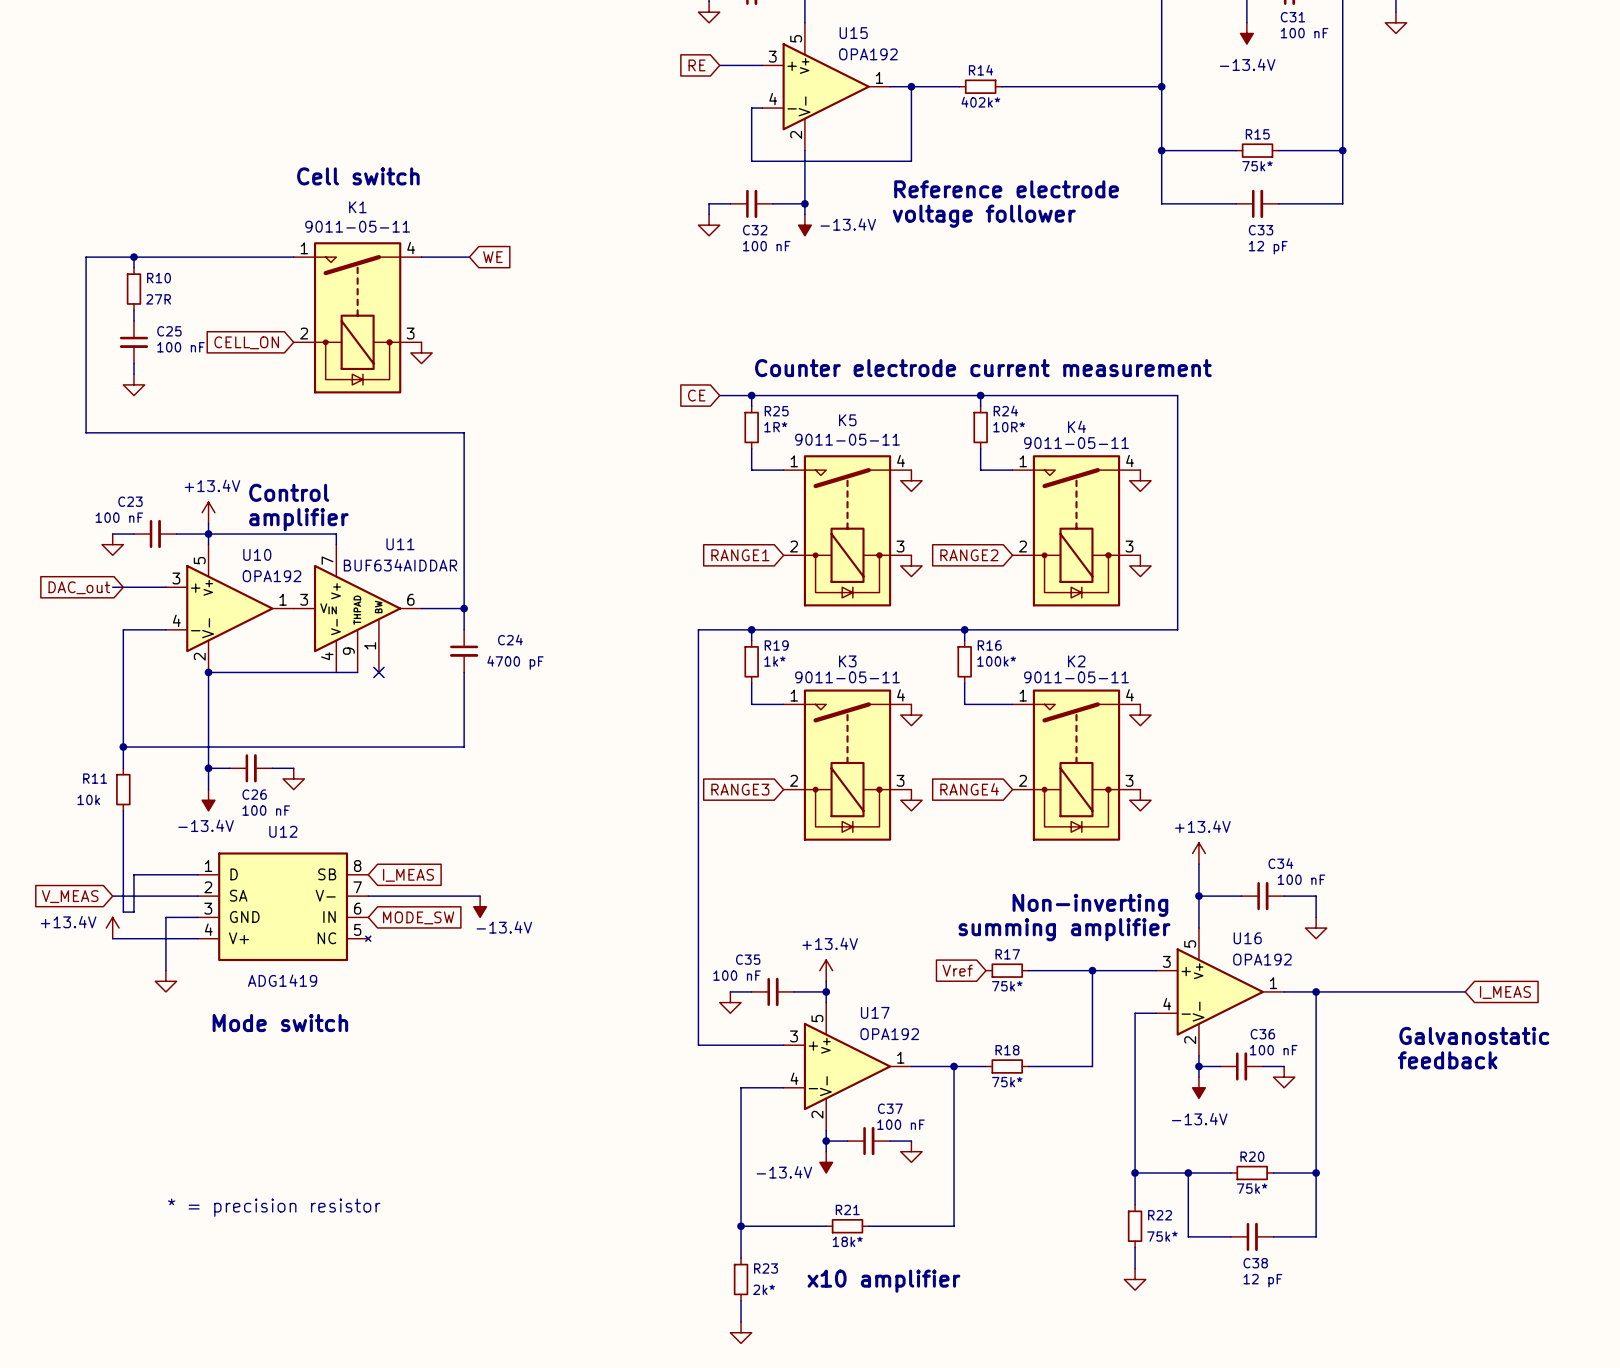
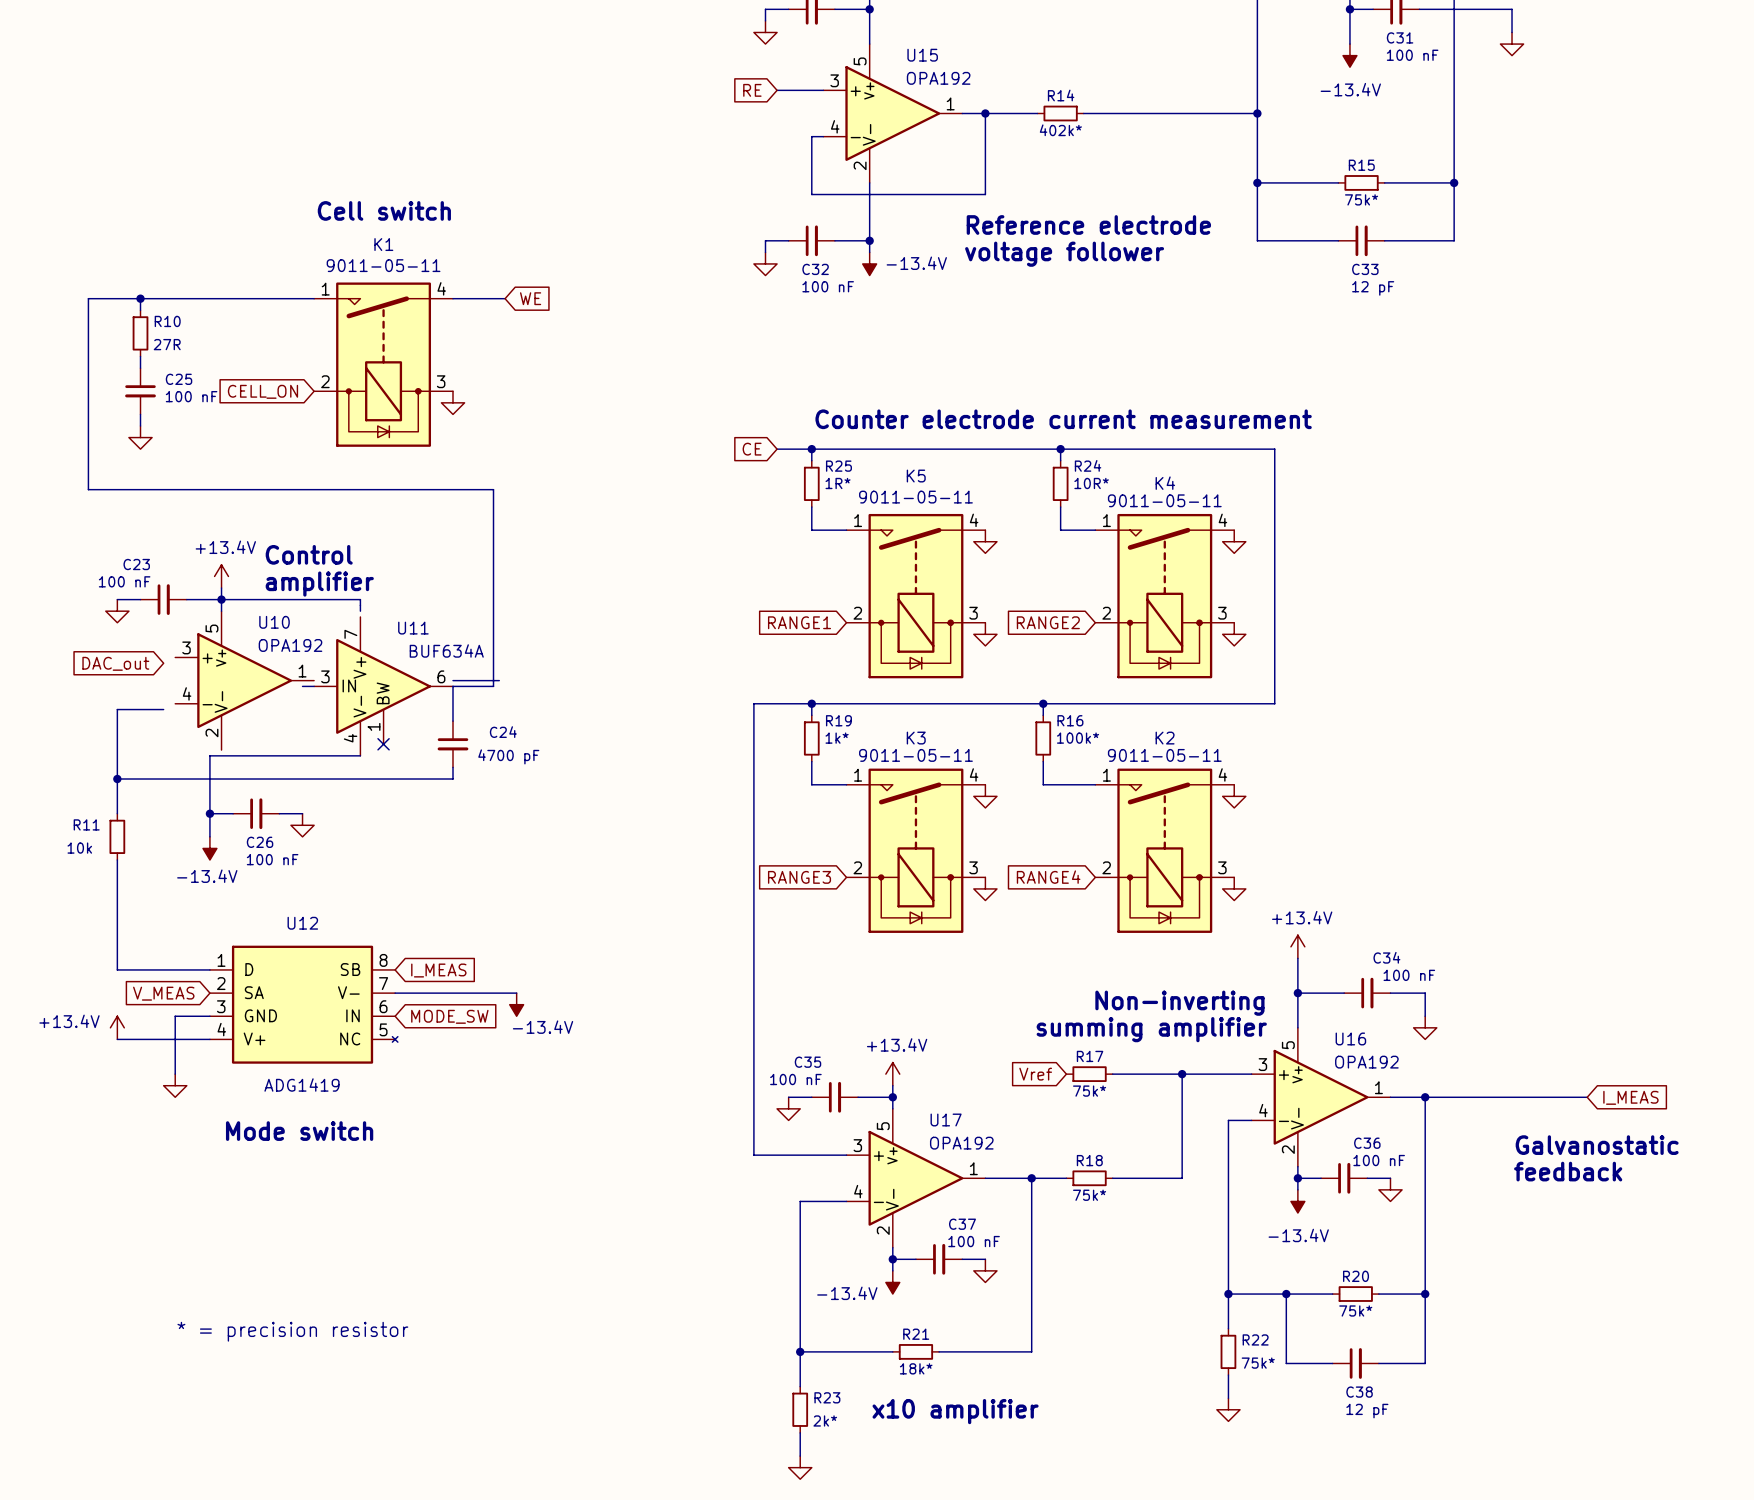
wire: (458, 432) (464, 432) (464, 629) -> (493, 489) (493, 686) (453, 686) (453, 721)
U11 symbol: [293, 544, 422, 673] -> [314, 616, 454, 756]
U11 name position: U11 (400, 544) -> U11 (413, 628)
U11 value: BUF634AIDDAR (400, 565) -> BUF634A (446, 650)
global label position: DAC_out (79, 587) -> DAC_out (115, 663)
wire: (112, 587) (165, 587) -> none
junction: (464, 608) -> none
wire: none -> (302, 686) (314, 686)
wire: (165, 629) (123, 629) (123, 768) -> none
wire: none -> (163, 709) (117, 709) (117, 813)
C24 position: (464, 651) -> (453, 744)
junction: (208, 672) -> none
wire: (357, 672) (208, 672) (208, 789) -> none
no-connect mark position: (378, 672) -> (383, 744)
wire: (464, 672) (464, 747) (123, 747) -> none
wire: none -> (360, 755) (209, 755) (209, 836)
wire: none -> (453, 767) (453, 779) (117, 779)
junction: none -> (117, 779)
junction: none -> (209, 813)
junction: (123, 747) -> none
wire: (208, 768) (229, 768) -> (209, 813) (233, 813)
junction: (208, 768) -> none
C26 position: (251, 768) -> (256, 813)
wire: (272, 768) (293, 768) -> (279, 813) (302, 813)
power symbol position: (293, 778) -> (302, 825)
R11 position: (123, 789) -> (117, 836)
power symbol position: -13.4V (208, 800) -> -13.4V (209, 848)
wire: (123, 810) (123, 912) (133, 912) (133, 874) -> (117, 860) (117, 969) (140, 969)
global label position: V_MEAS (70, 896) -> V_MEAS (163, 993)
wire: (112, 896) (197, 896) -> none

